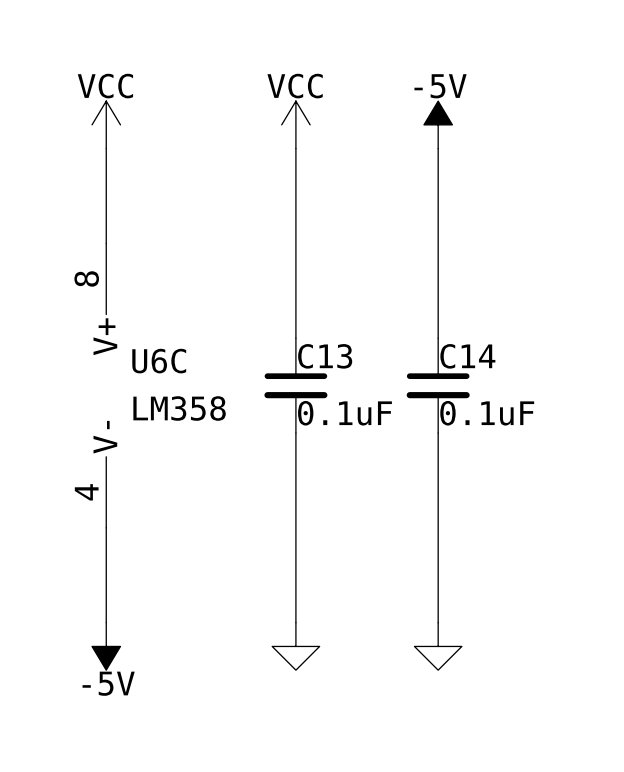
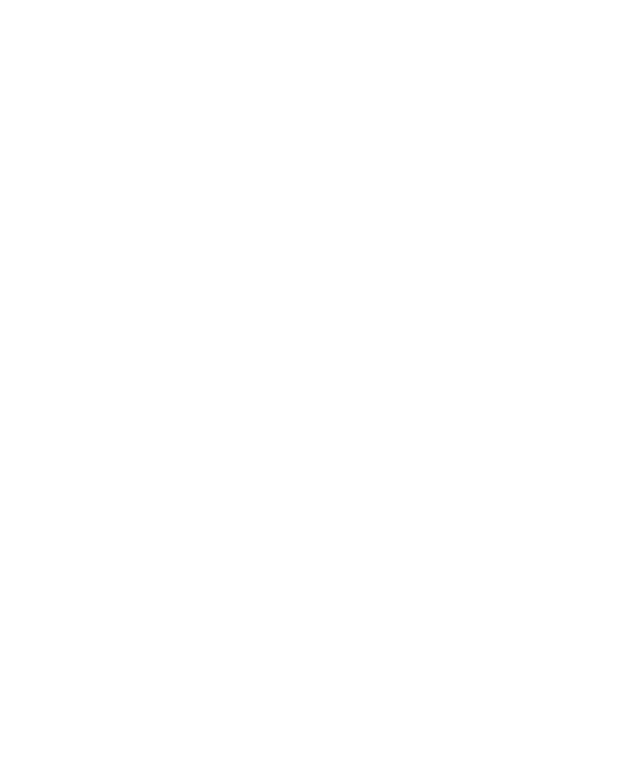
power symbol: VCC (106, 124) -> none
power symbol: VCC (295, 124) -> none
power symbol: -5V (438, 124) -> none
wire: (106, 148) (106, 243) -> none
wire: (295, 148) (295, 338) -> none
wire: (438, 148) (438, 338) -> none
U6C: LM358 (106, 385) -> none
C13: 0.1uF (295, 385) -> none
C14: 0.1uF (438, 385) -> none
wire: (295, 433) (295, 622) -> none
wire: (438, 433) (438, 622) -> none
wire: (106, 527) (106, 622) -> none
power symbol: -5V (106, 646) -> none
power symbol: (295, 646) -> none
power symbol: (438, 646) -> none

